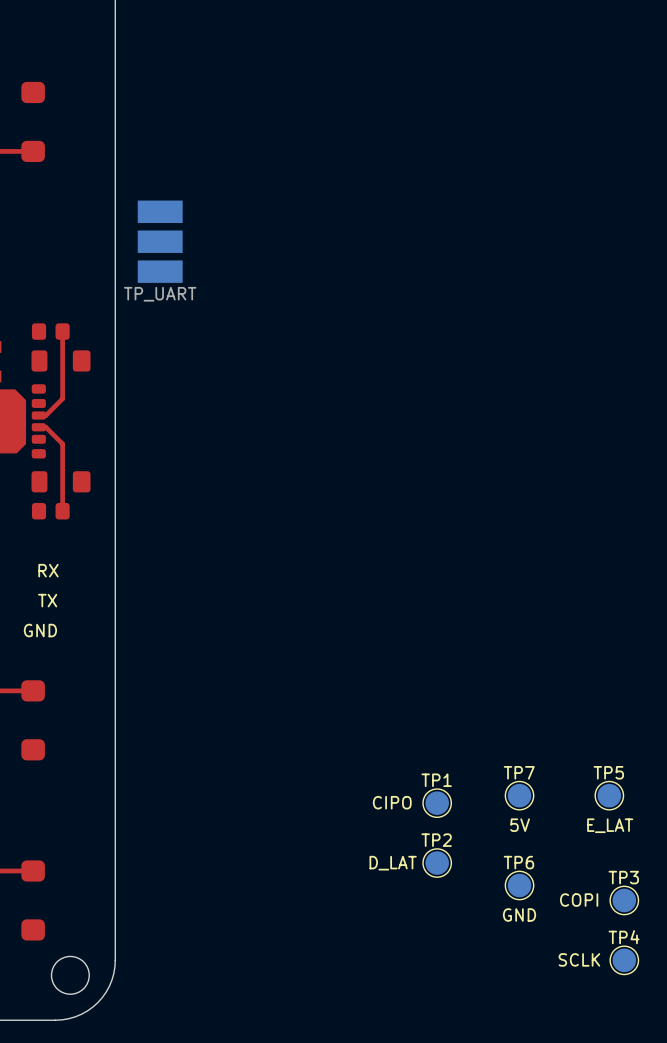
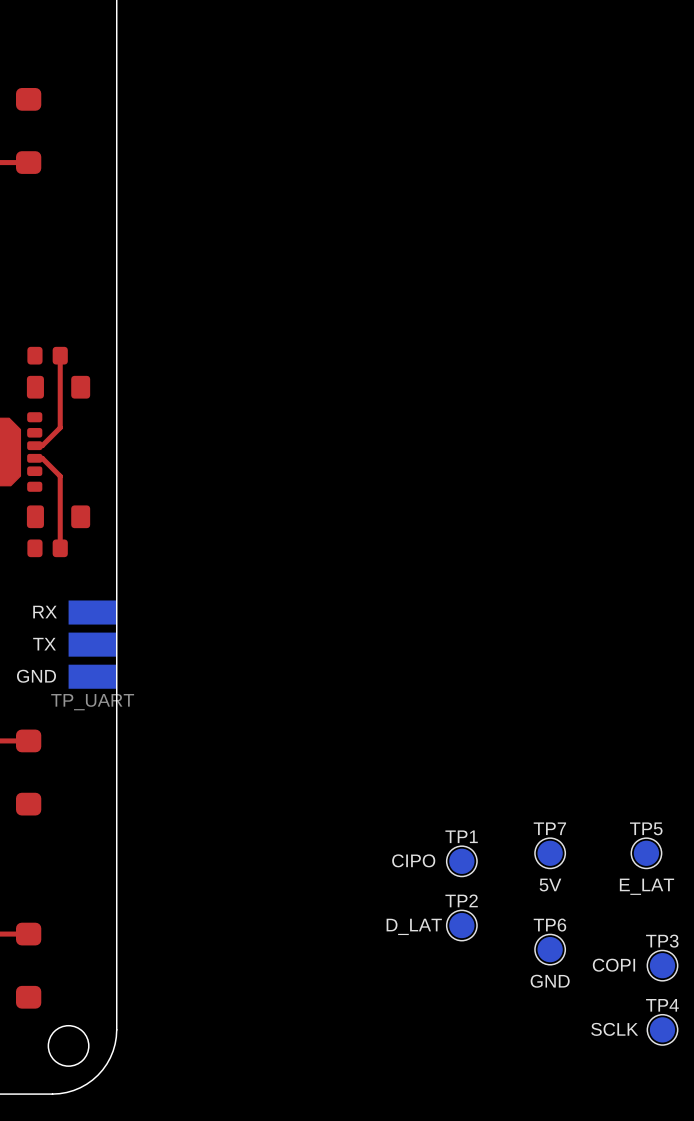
part: TP_UART (160, 241) -> none
part: none -> TP_UART (92, 644)

